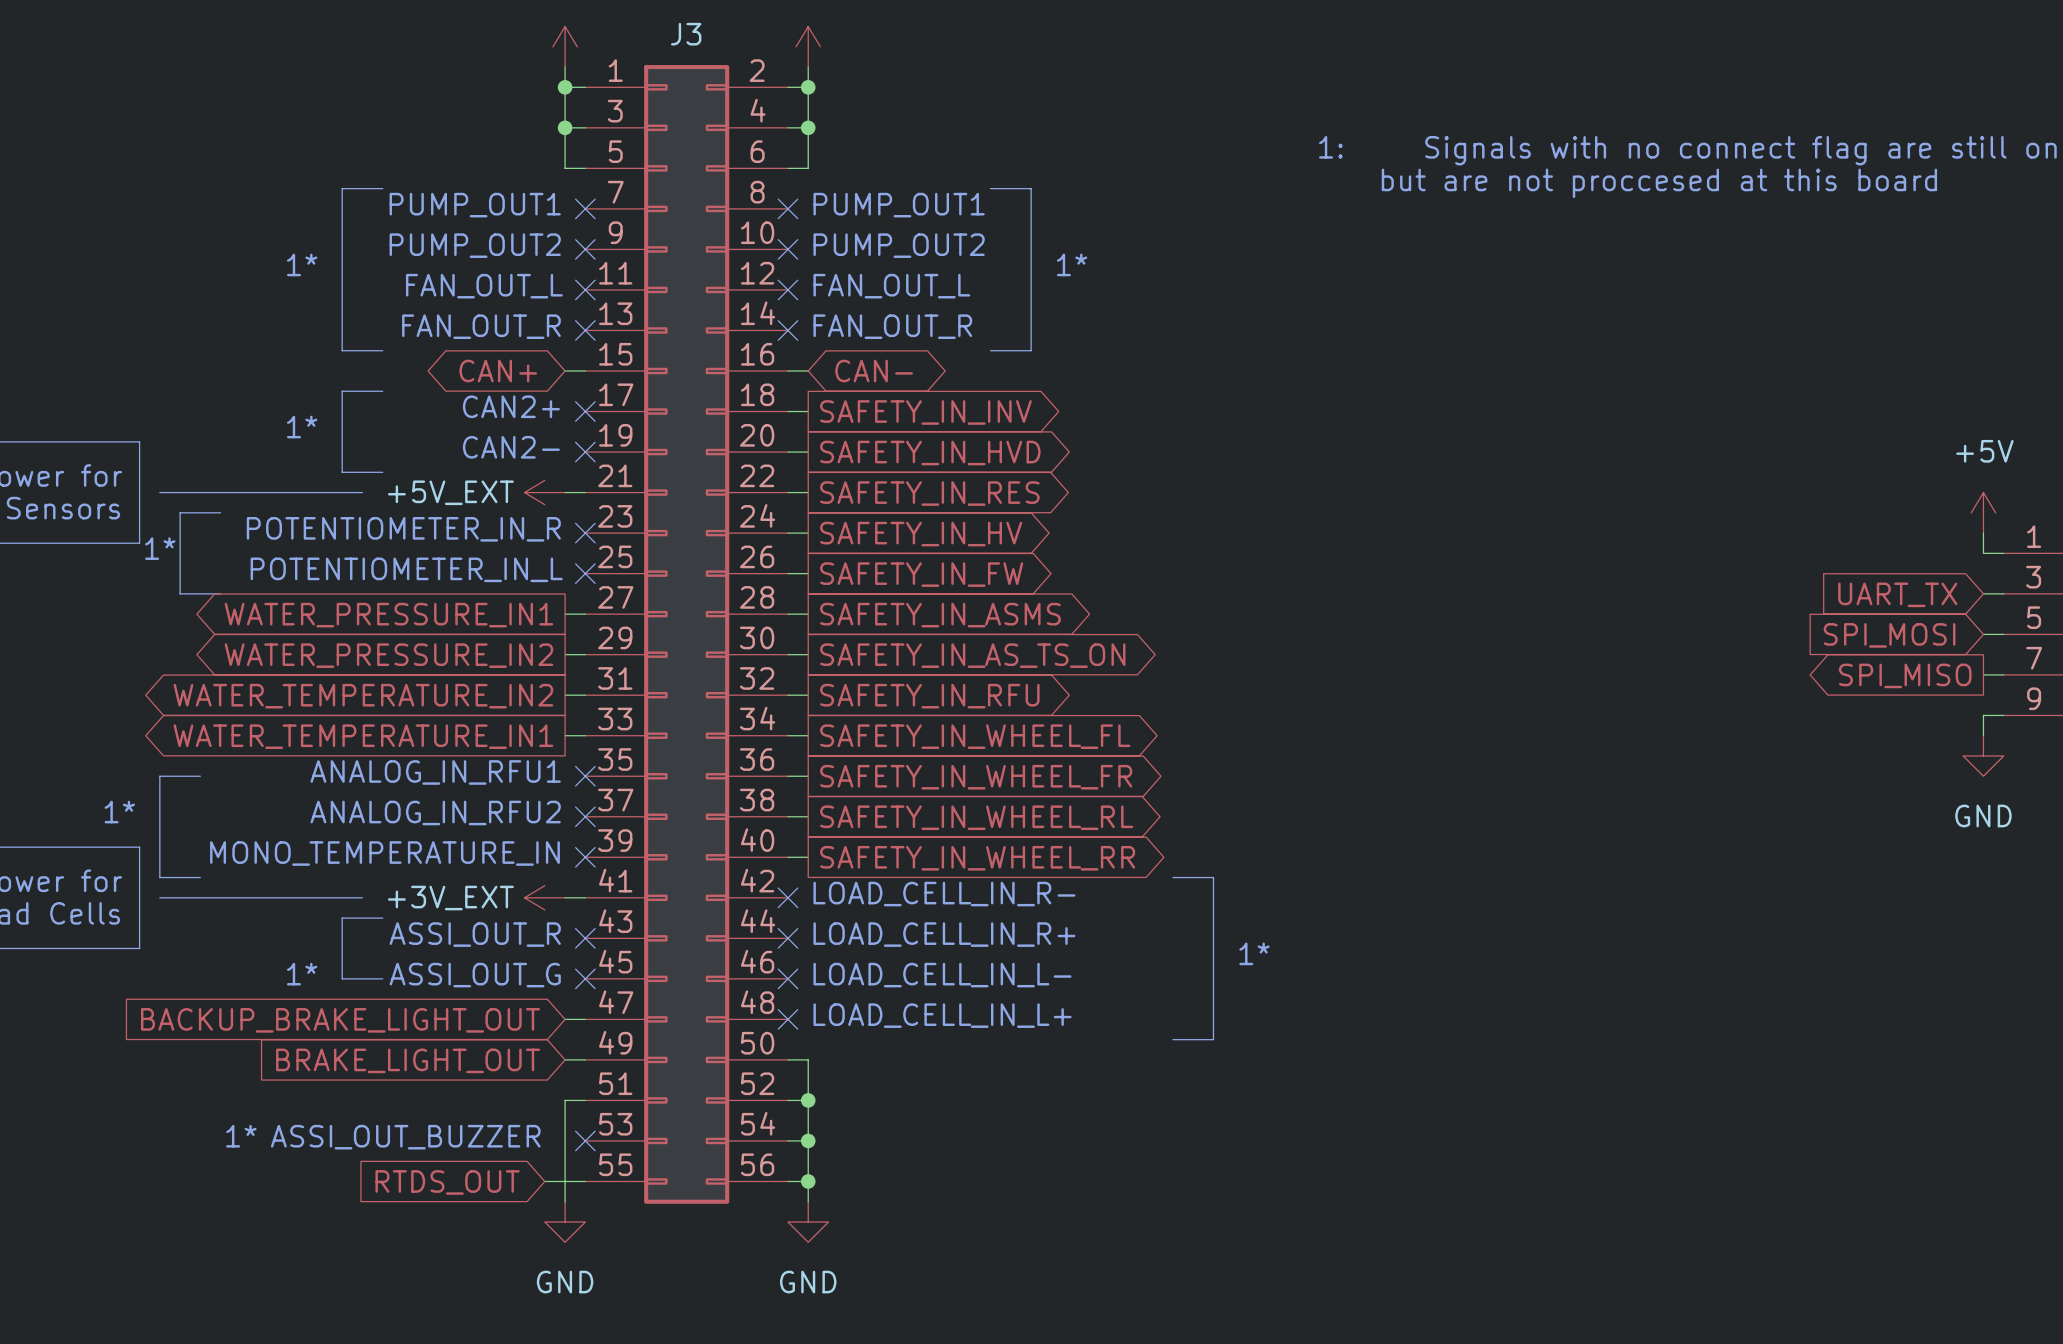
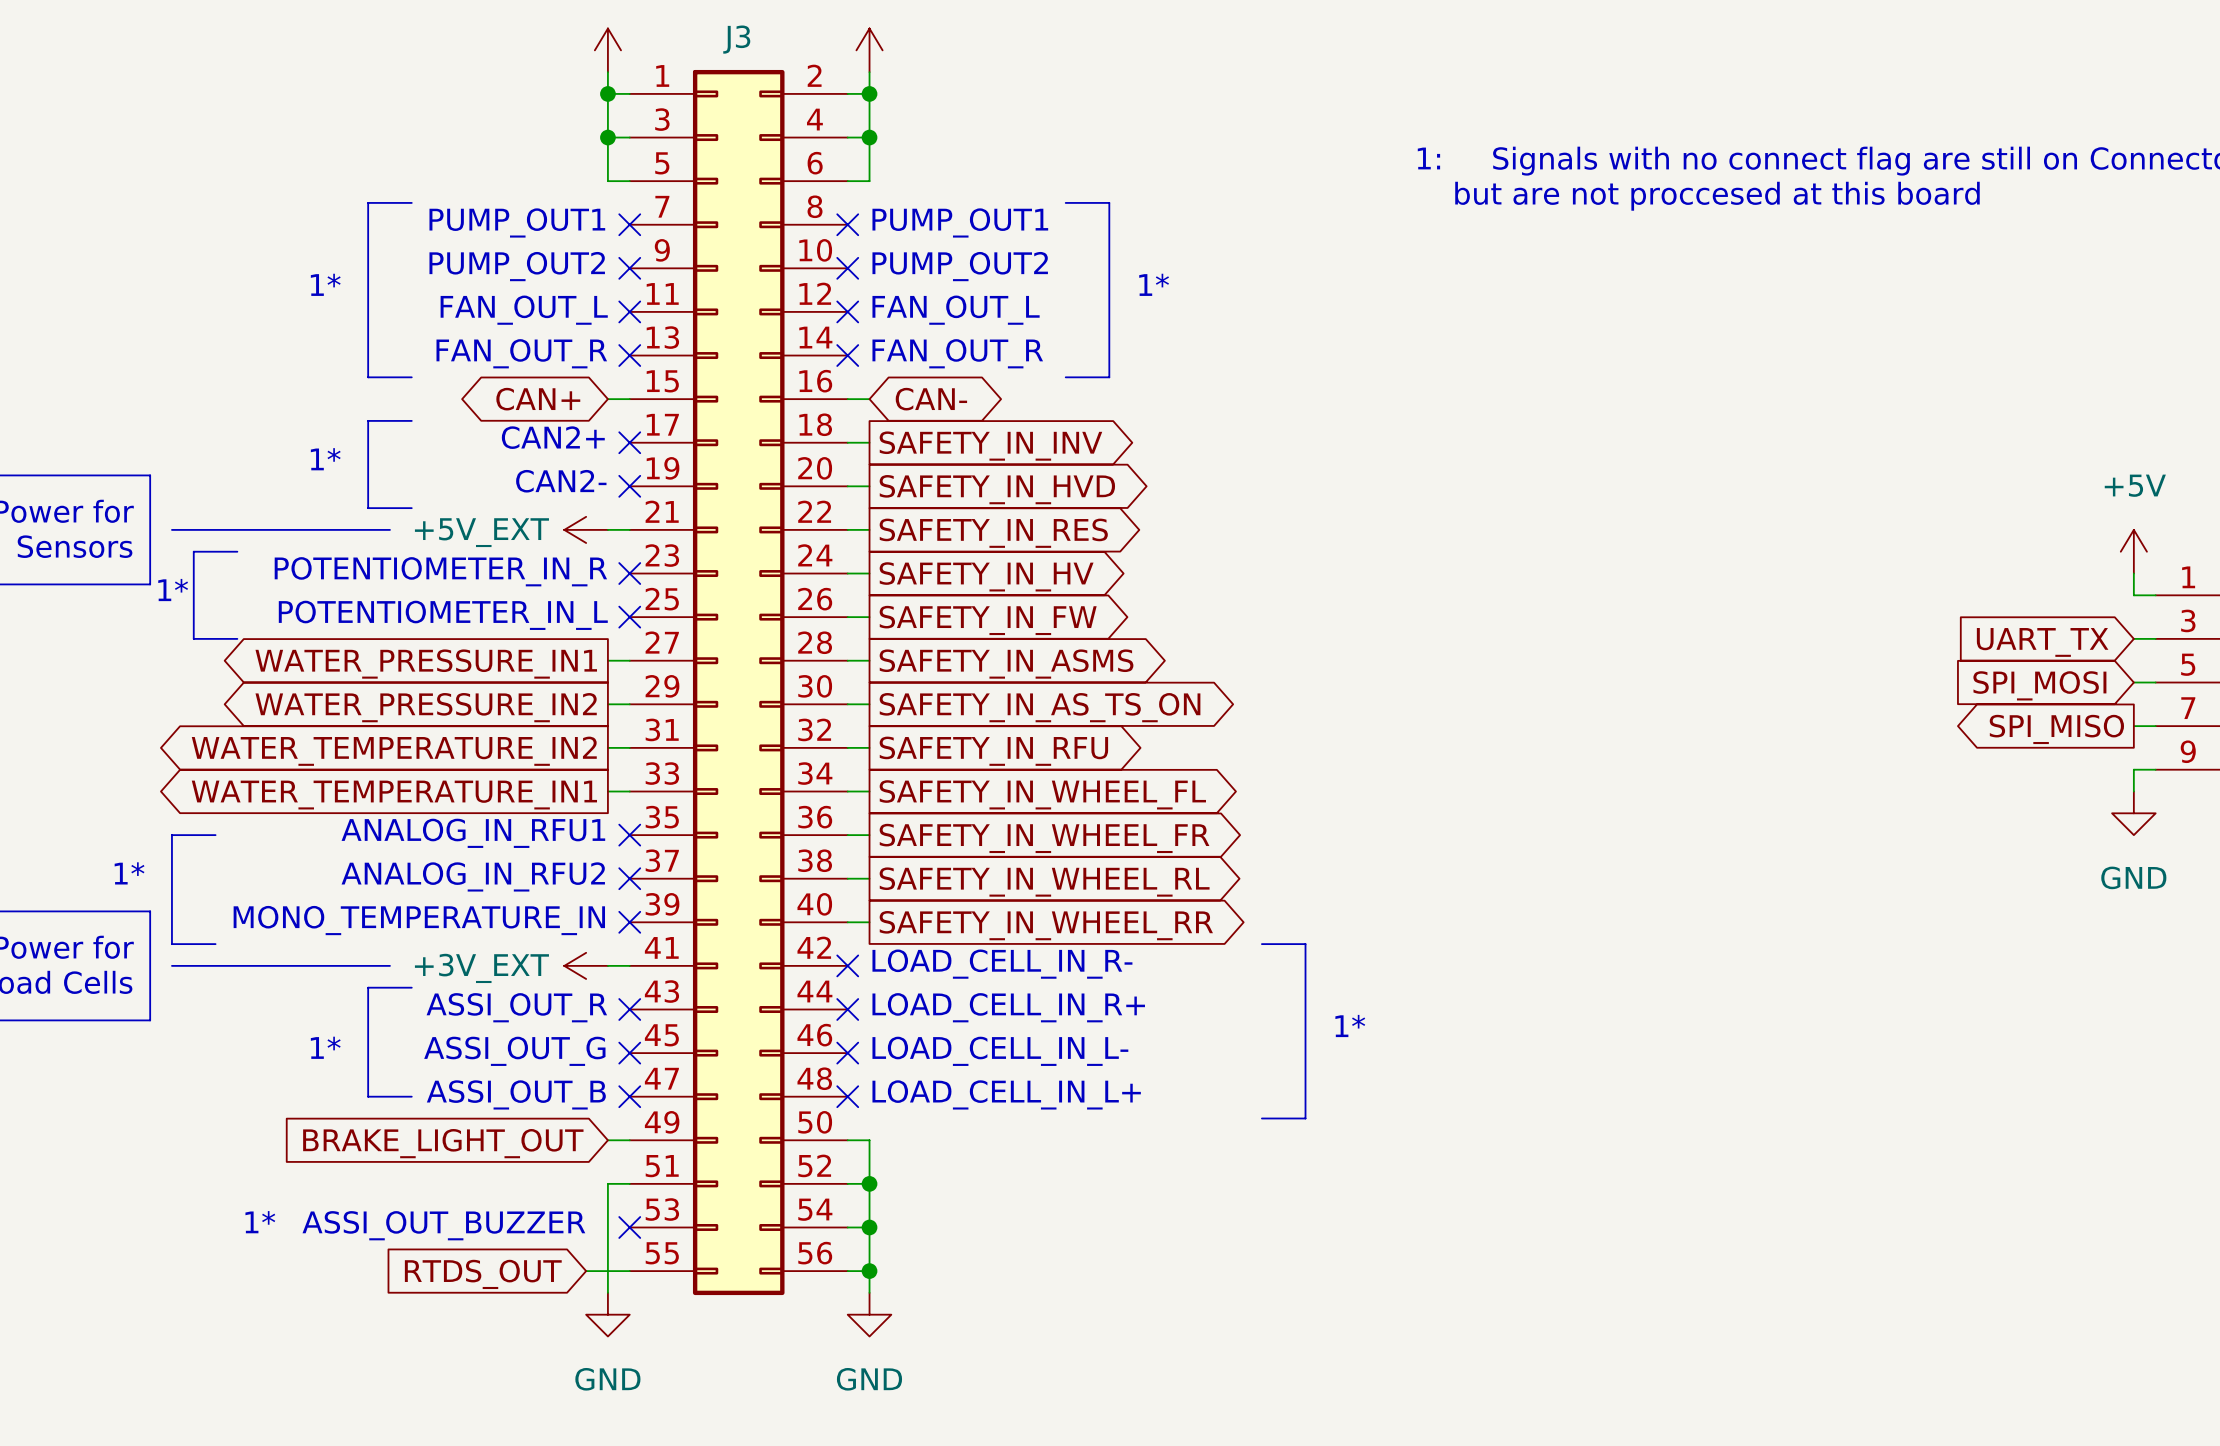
line: (342, 978) (382, 978) -> (368, 1053) (368, 1096) (411, 1096)
text: none -> ASSI_OUT_B (516, 1094)
wire: (565, 1019) (585, 1019) -> none
no-connect mark: none -> (629, 1096)
global label: BACKUP_BRAKE_LIGHT_OUT (340, 1020) -> none

